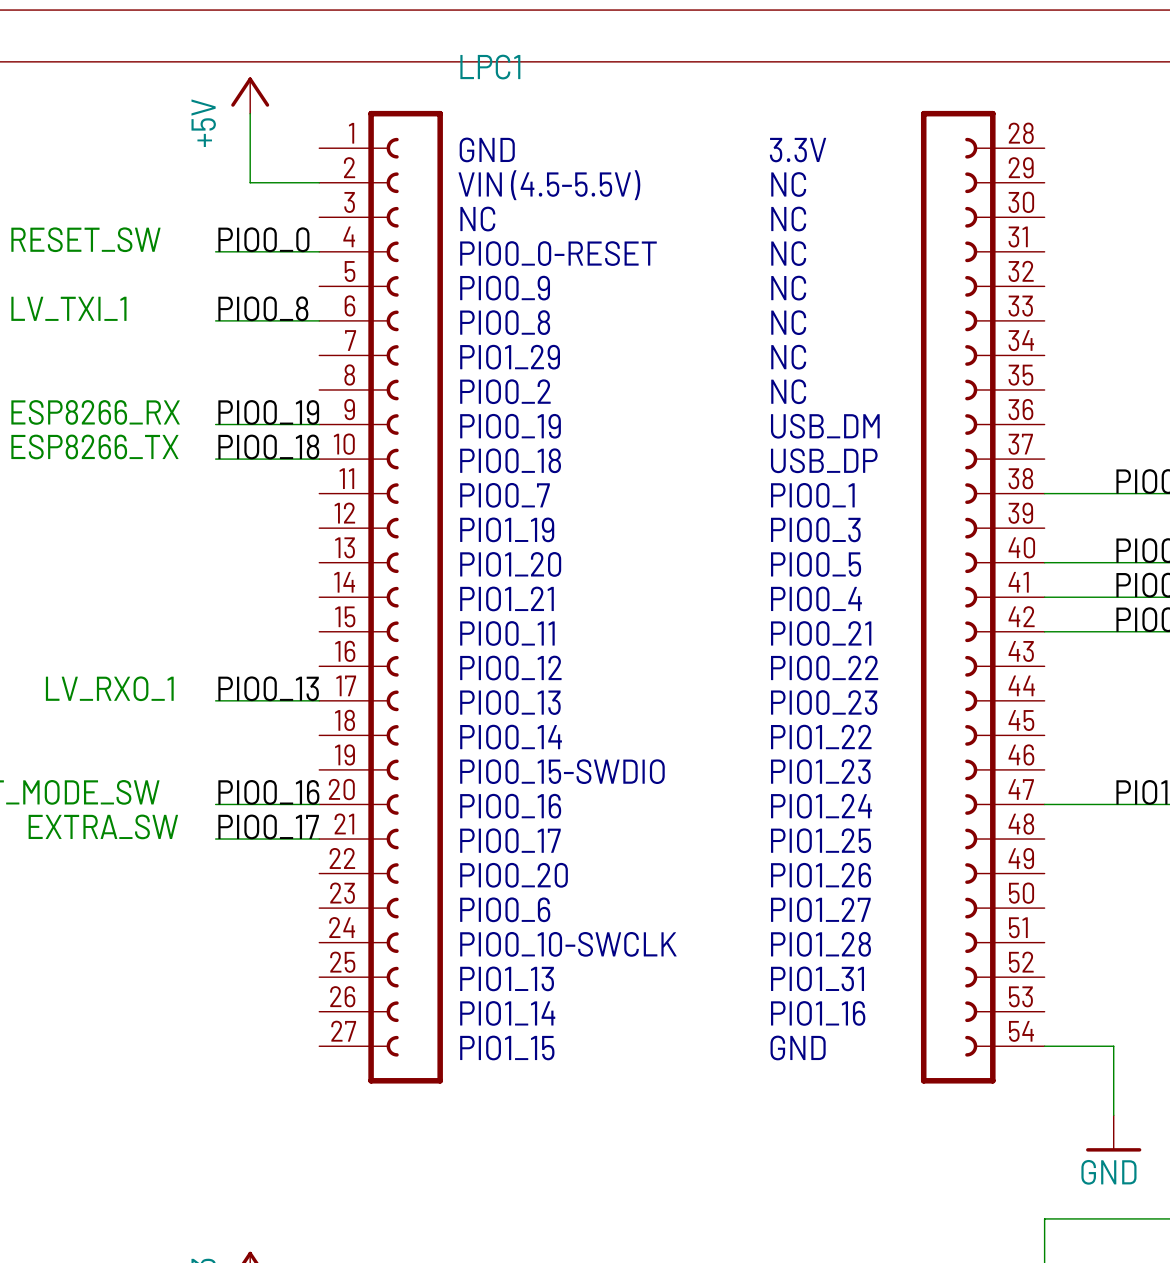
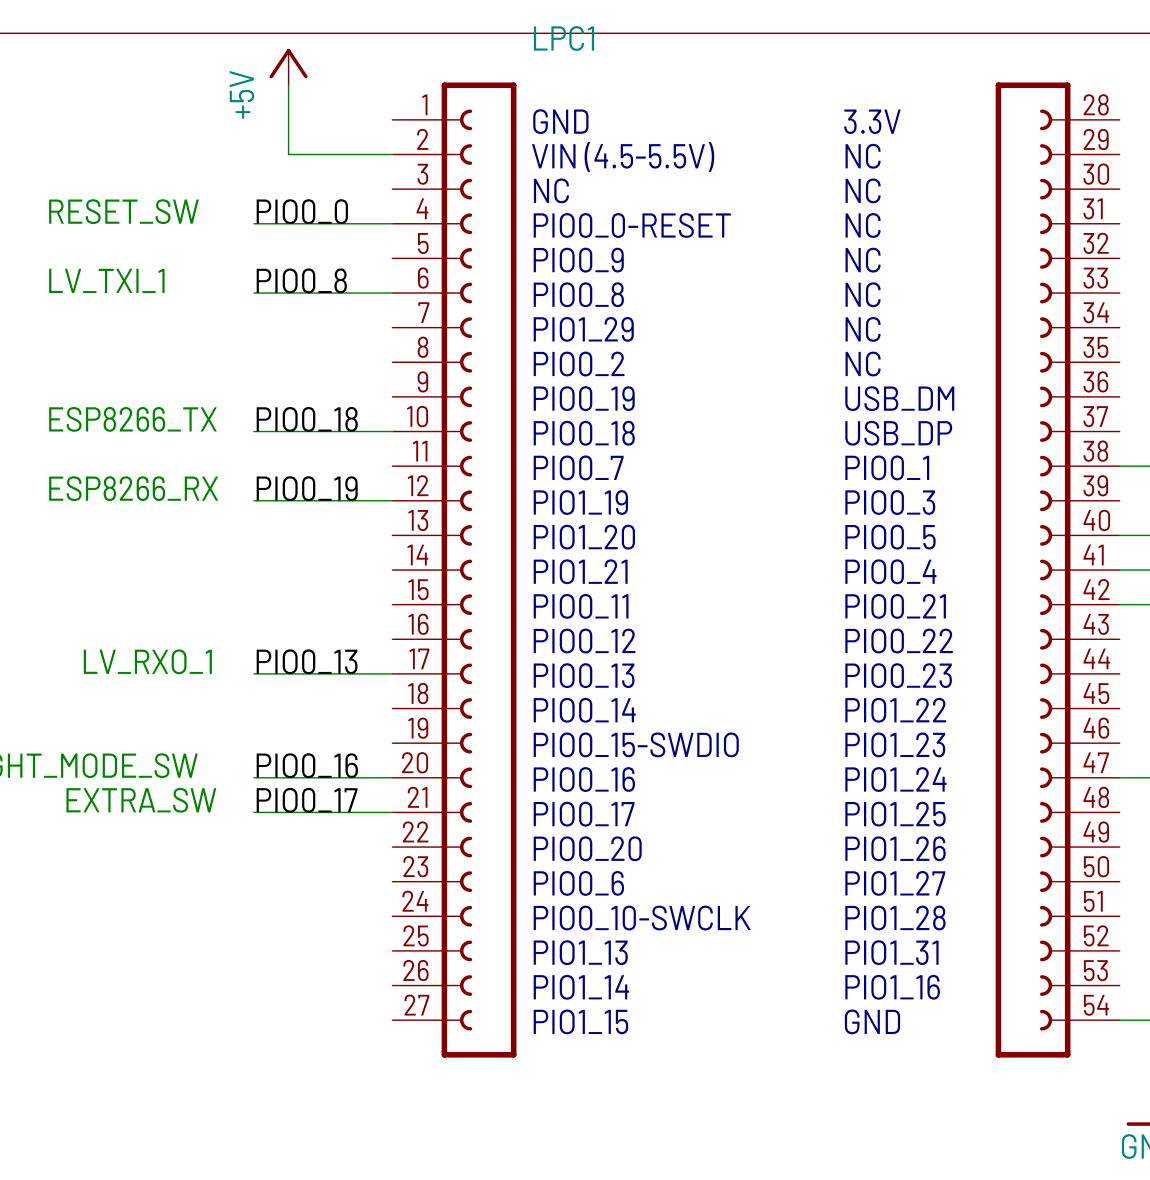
text position: ESP8266_RX (95, 412) -> ESP8266_RX (133, 488)
label position: PIO0_19 (268, 412) -> PIO0_19 (307, 488)
wire: (215, 424) (319, 424) -> none
wire: none -> (253, 500) (392, 500)
LPC1 position: (681, 597) -> (756, 570)

